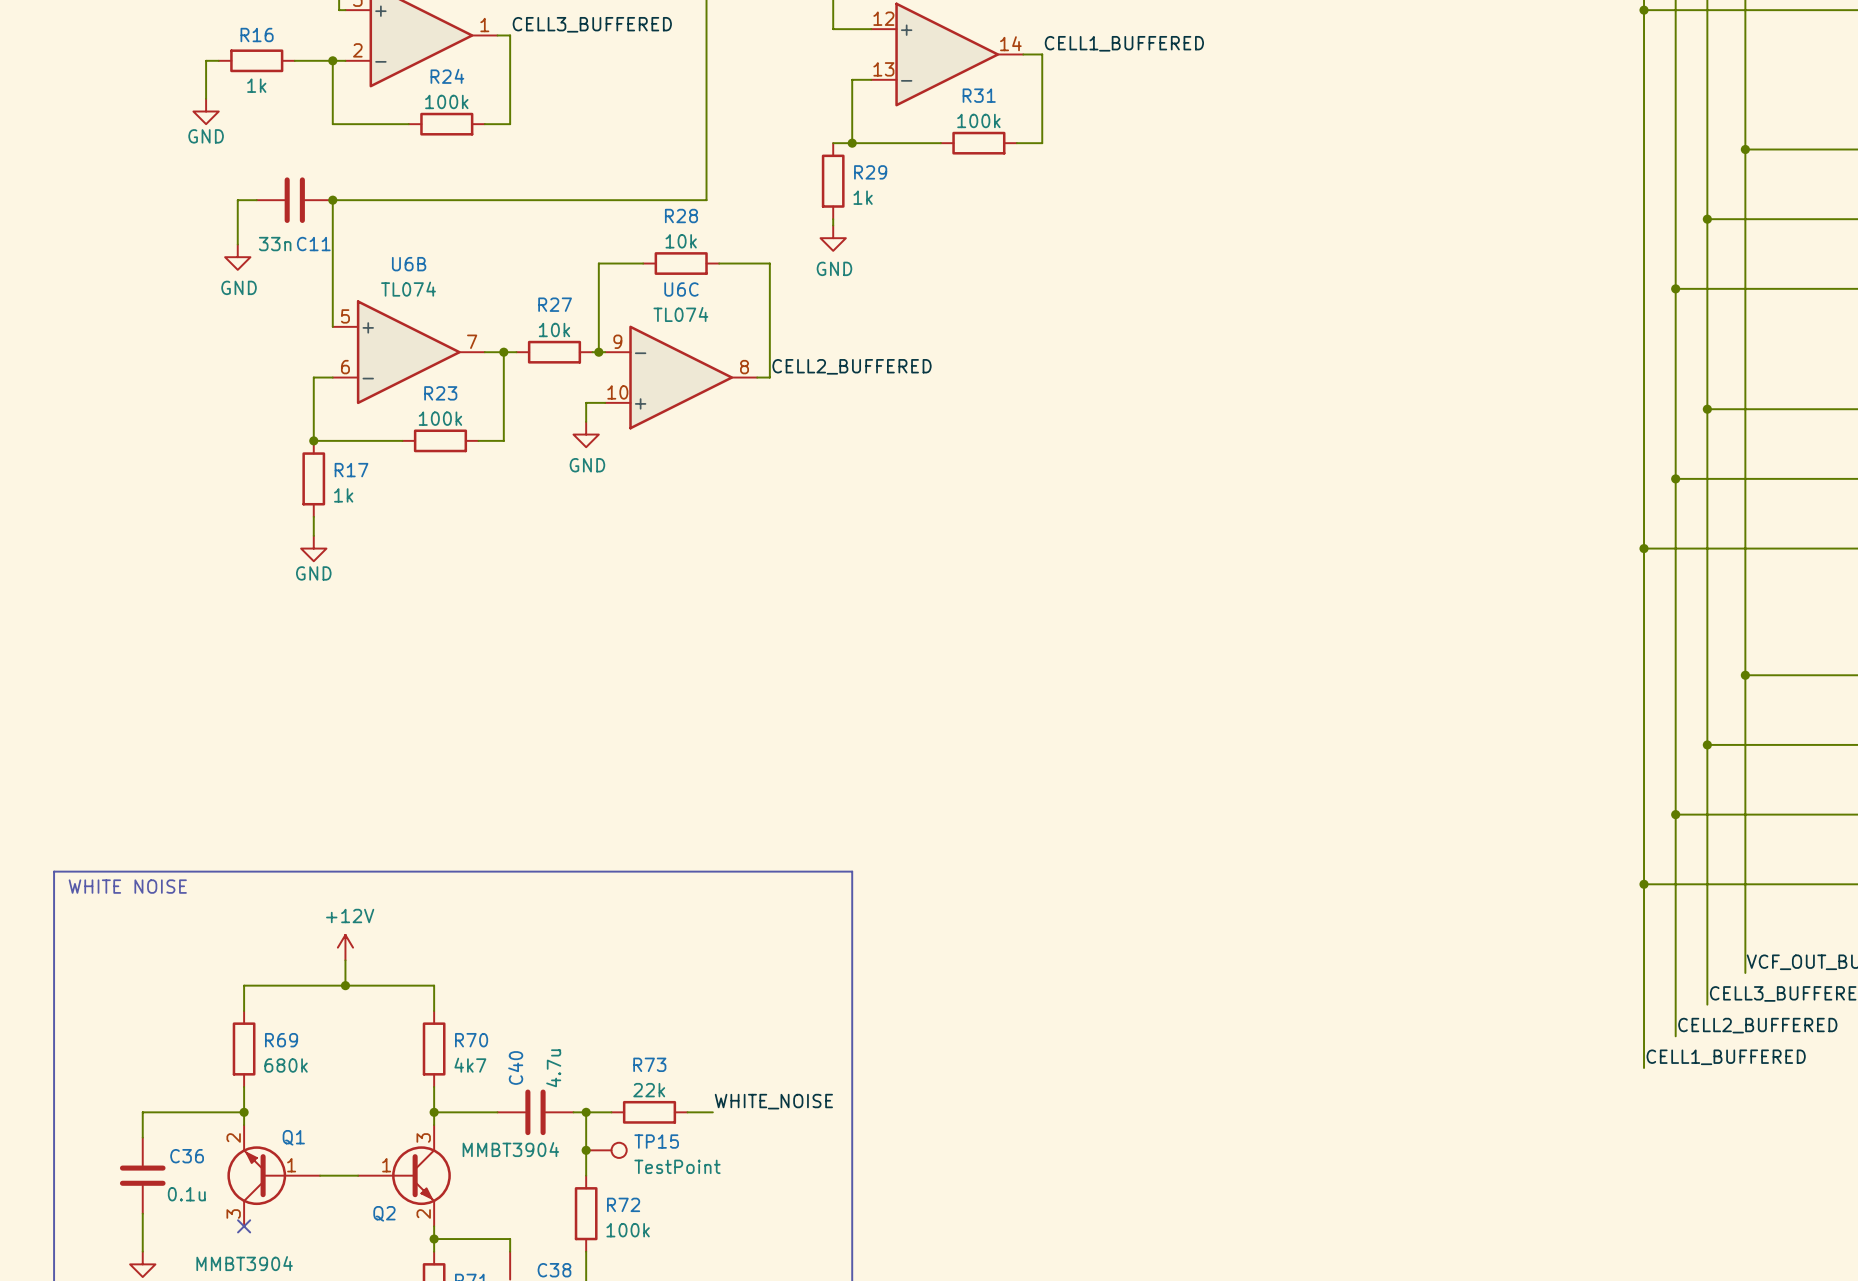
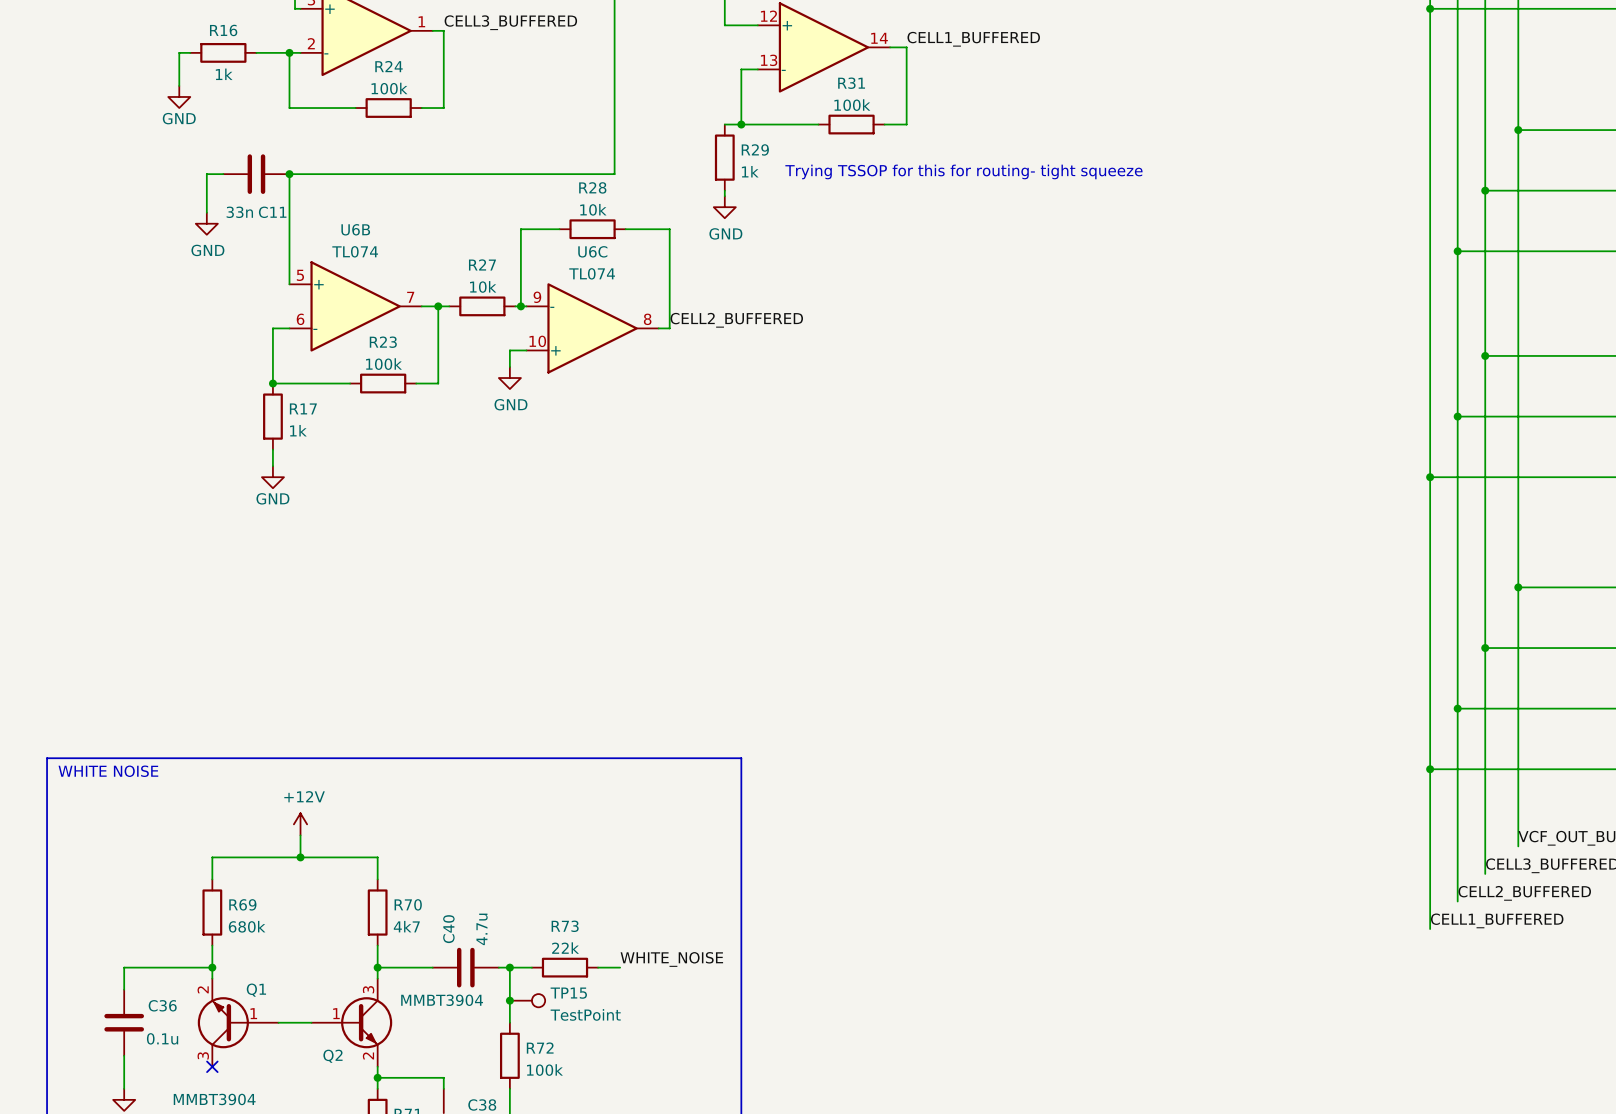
text: none -> Trying TSSOP for this for routing- tight squeeze (963, 171)

